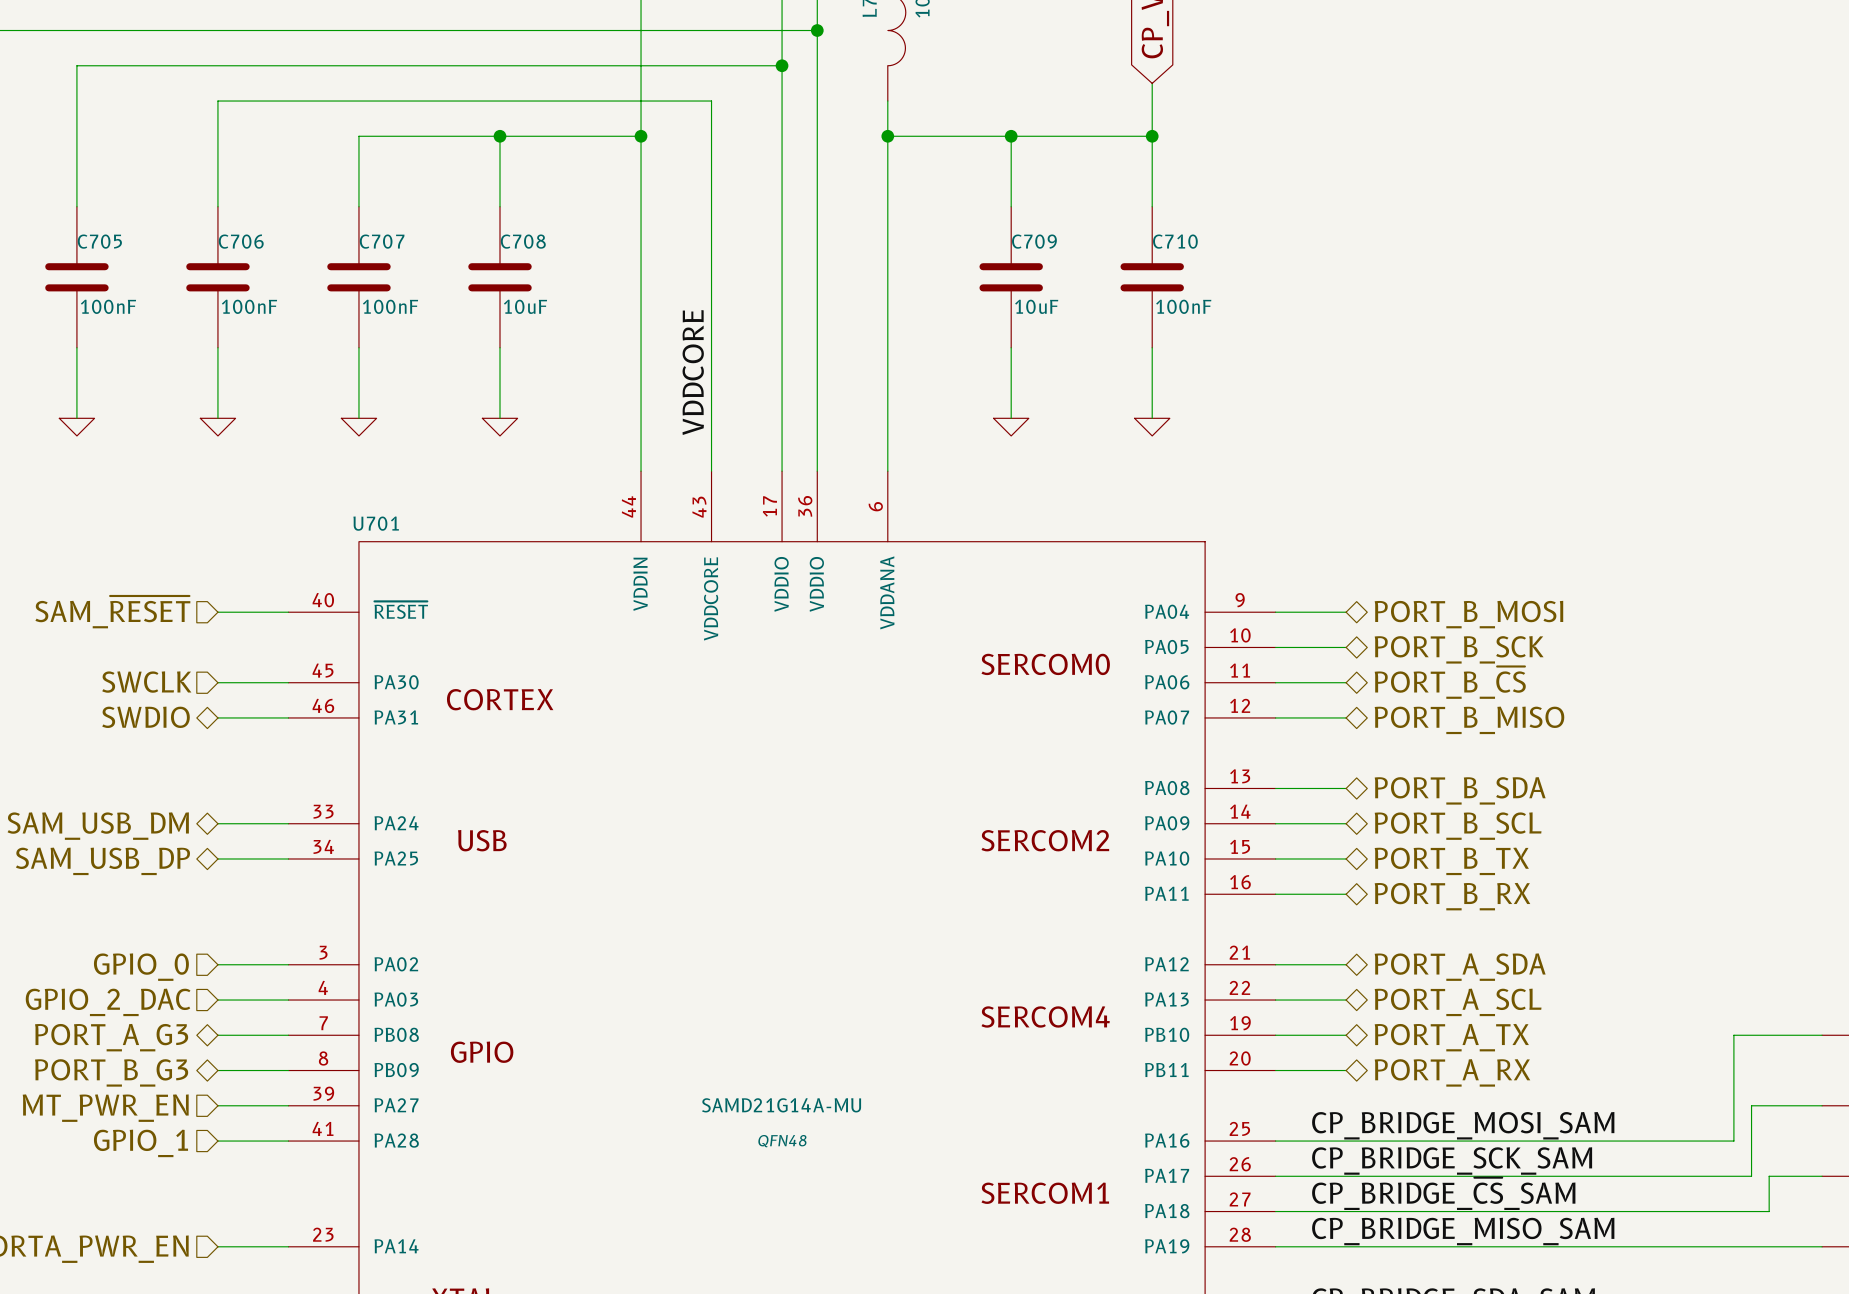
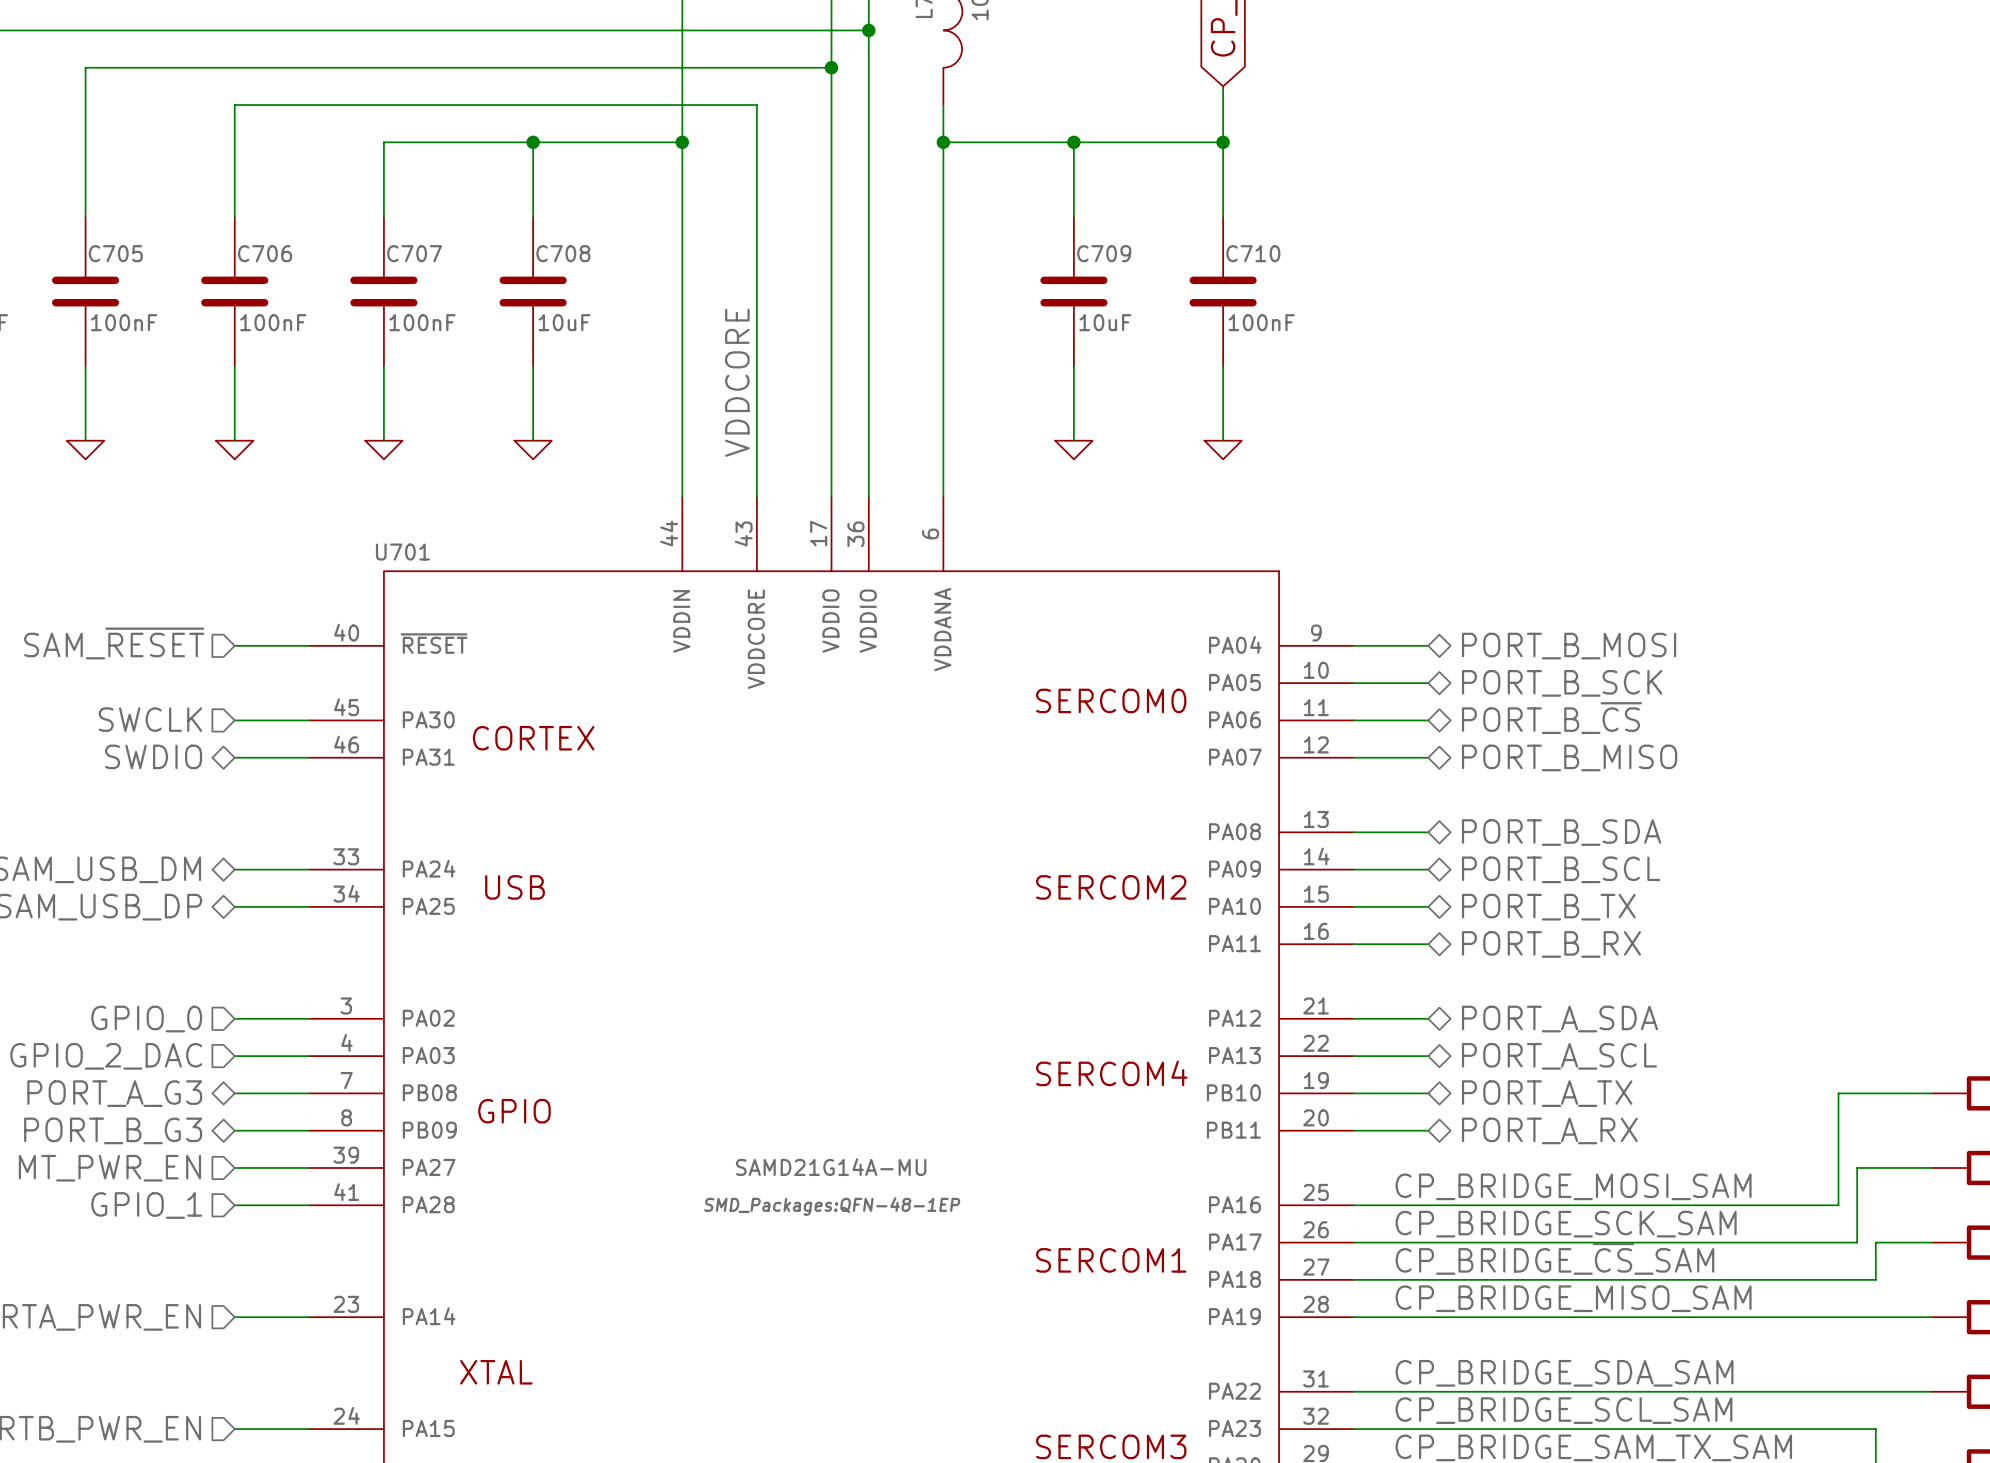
U701 text: QFN48 (782, 1141) -> SMD_Packages:QFN-48-1EP (832, 1206)

